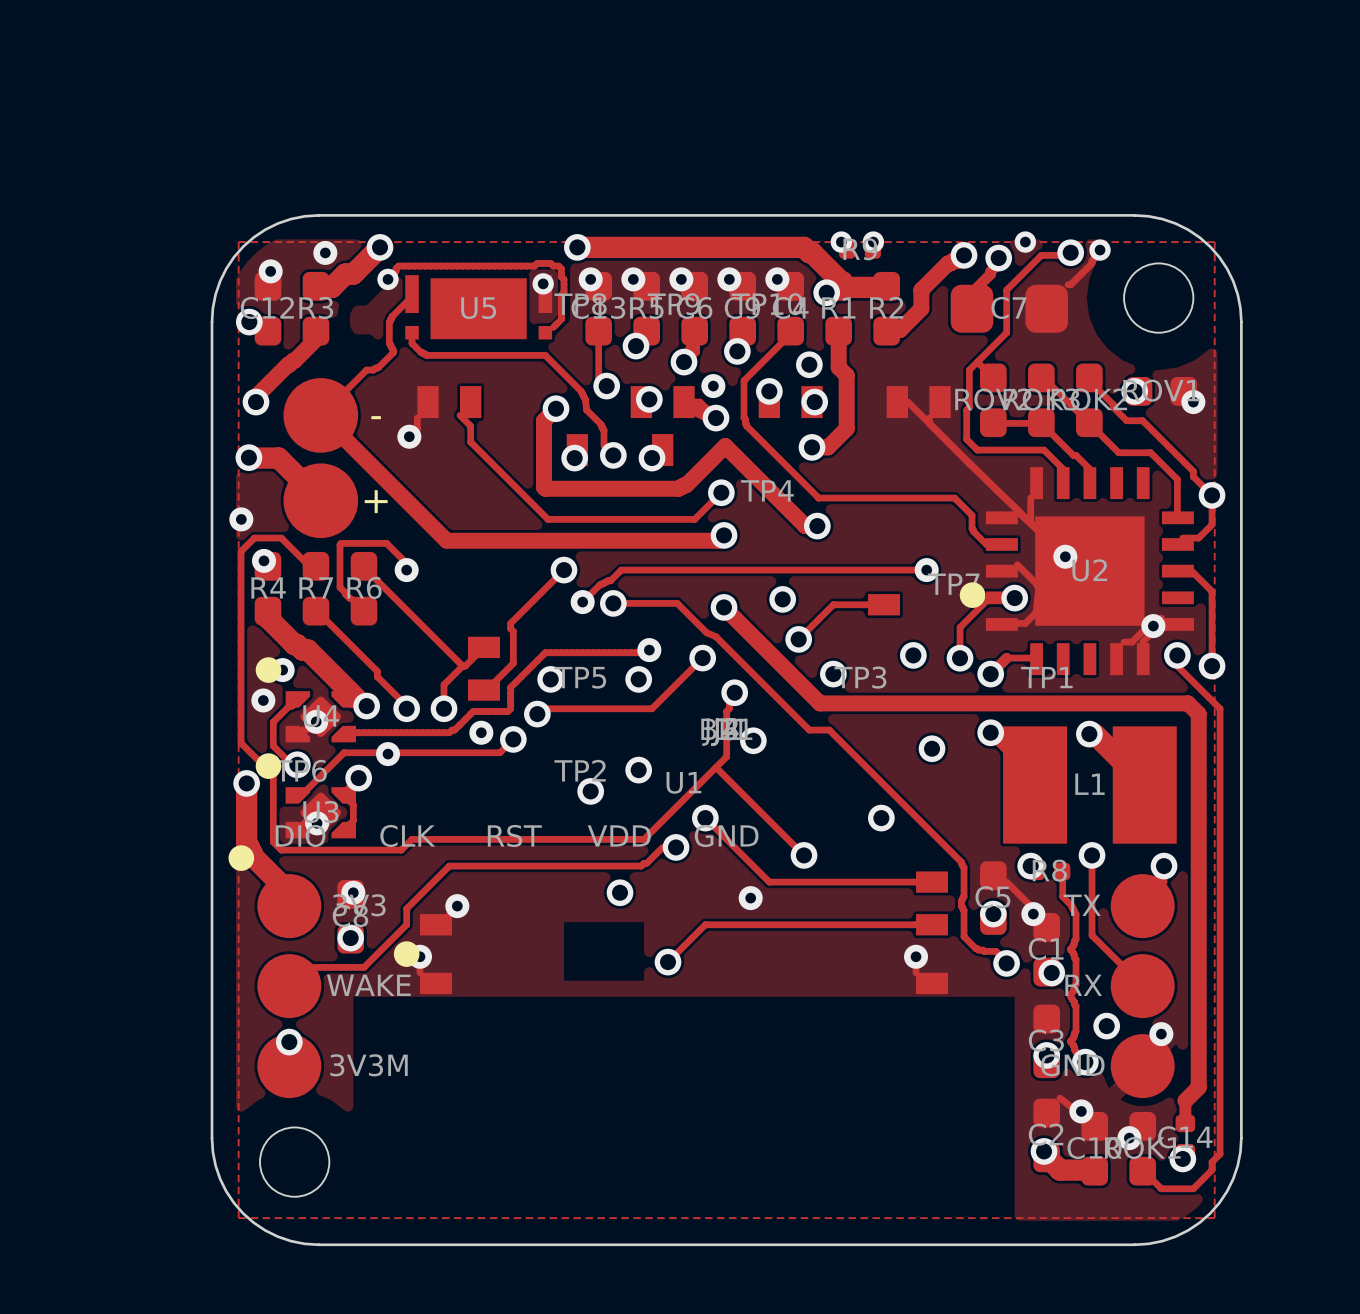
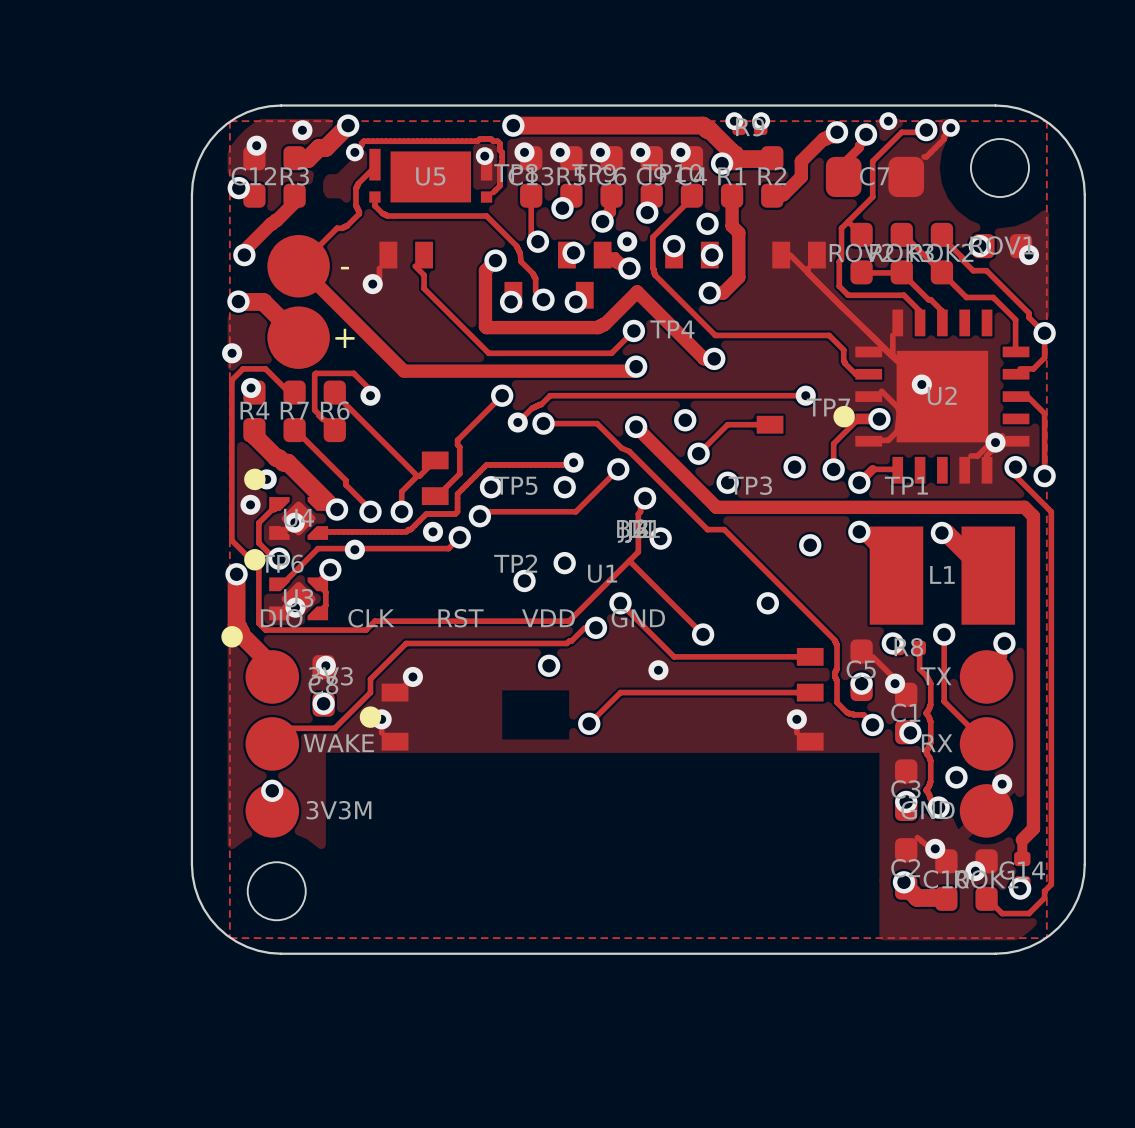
board edge: (318, 215) (1134, 215) (1148, 216) (1175, 223) (1188, 229) (1210, 246) (1219, 257) (1233, 281) (1240, 308) (1241, 322) (1241, 1138) (1240, 1152) (1233, 1178) (1219, 1203) (1210, 1213) (1188, 1230) (1175, 1236) (1162, 1241) (1134, 1244) (318, 1244) (291, 1241) (277, 1236) (265, 1230) (243, 1213) (234, 1203) (220, 1178) (215, 1165) (211, 1138) (212, 308) (220, 281) (234, 257) (243, 246) (265, 229) (277, 223) (291, 219) (318, 215) -> (281, 105) (258, 108) (247, 112) (226, 123) (210, 140) (203, 150) (194, 171) (192, 183) (191, 864) (194, 887) (198, 898) (203, 909) (218, 927) (236, 941) (247, 946) (258, 950) (281, 953) (995, 953) (1018, 950) (1029, 946) (1040, 941) (1058, 927) (1066, 918) (1078, 898) (1084, 876) (1084, 864) (1084, 194) (1081, 171) (1078, 160) (1072, 150) (1058, 131) (1040, 117) (1029, 112) (1018, 108) (995, 105) (281, 105)

